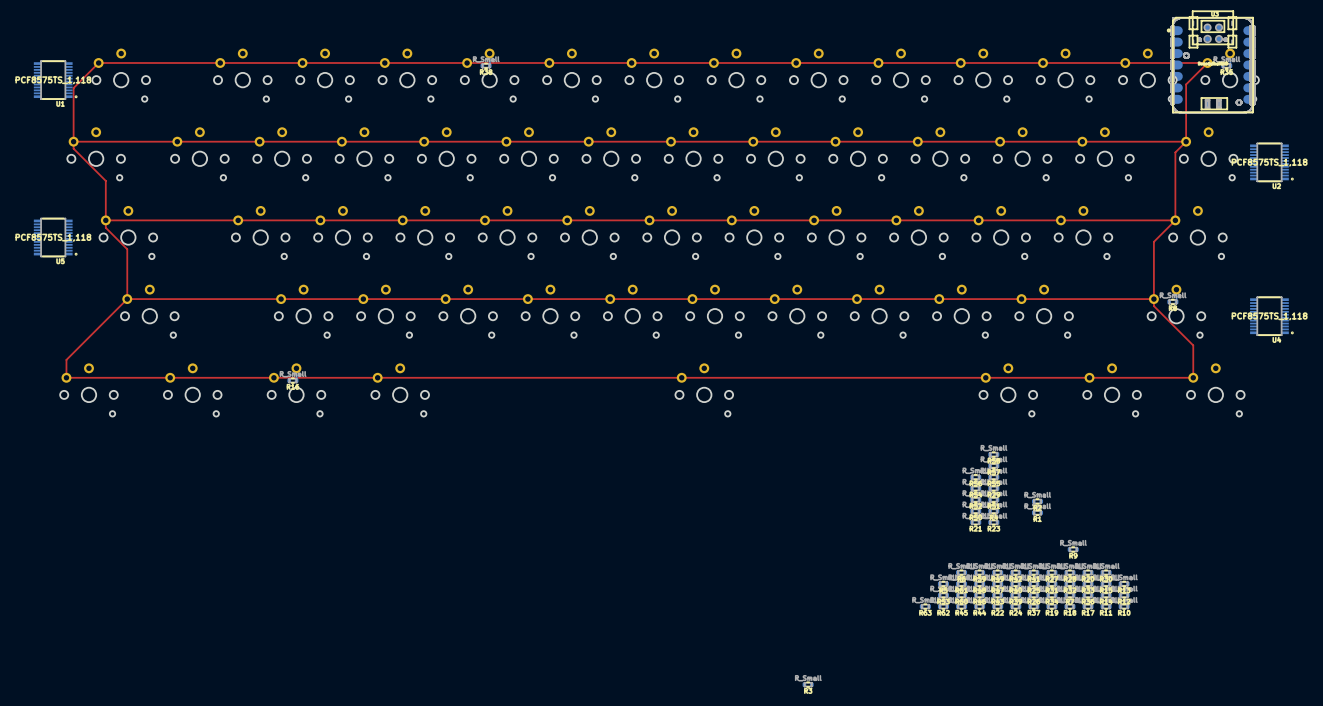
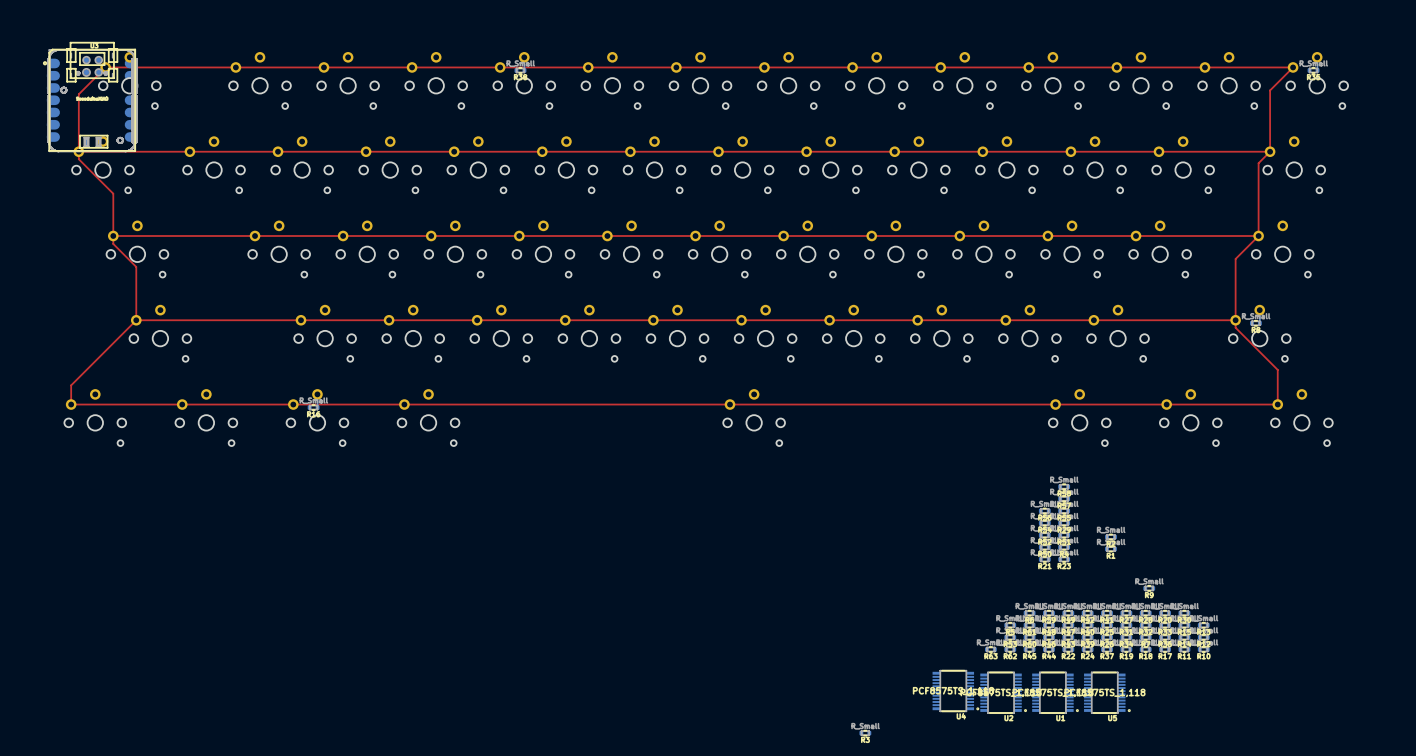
part position: (1211, 61) -> (90, 96)
part position: (55, 80) -> (1055, 692)
part position: (1271, 162) -> (1003, 692)
part position: (55, 237) -> (1107, 692)
part position: (1271, 316) -> (955, 691)

